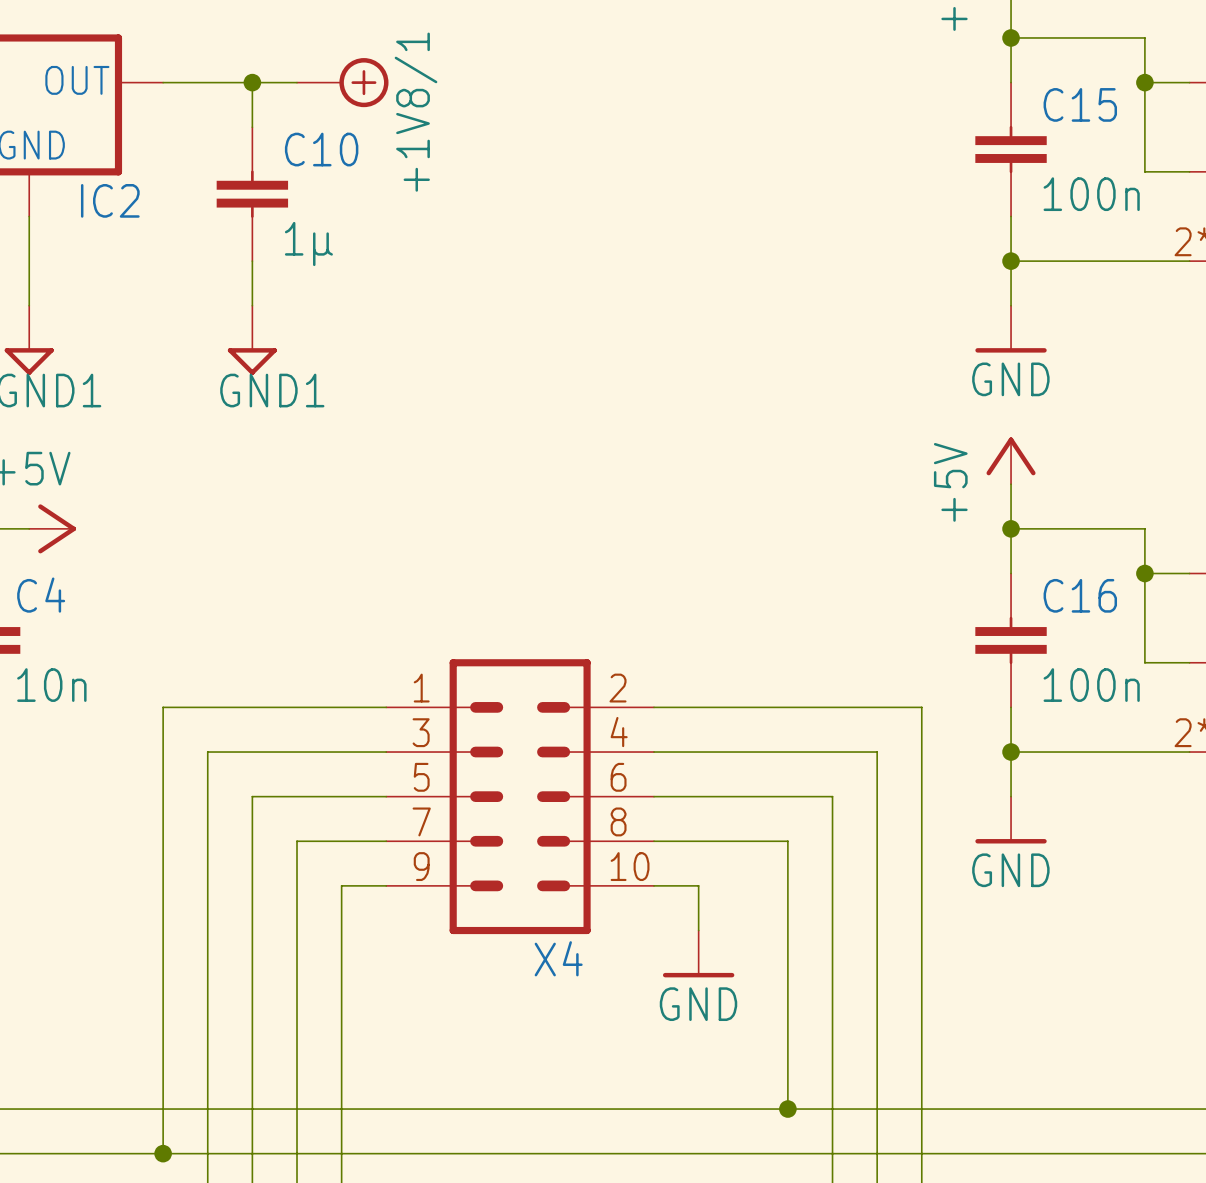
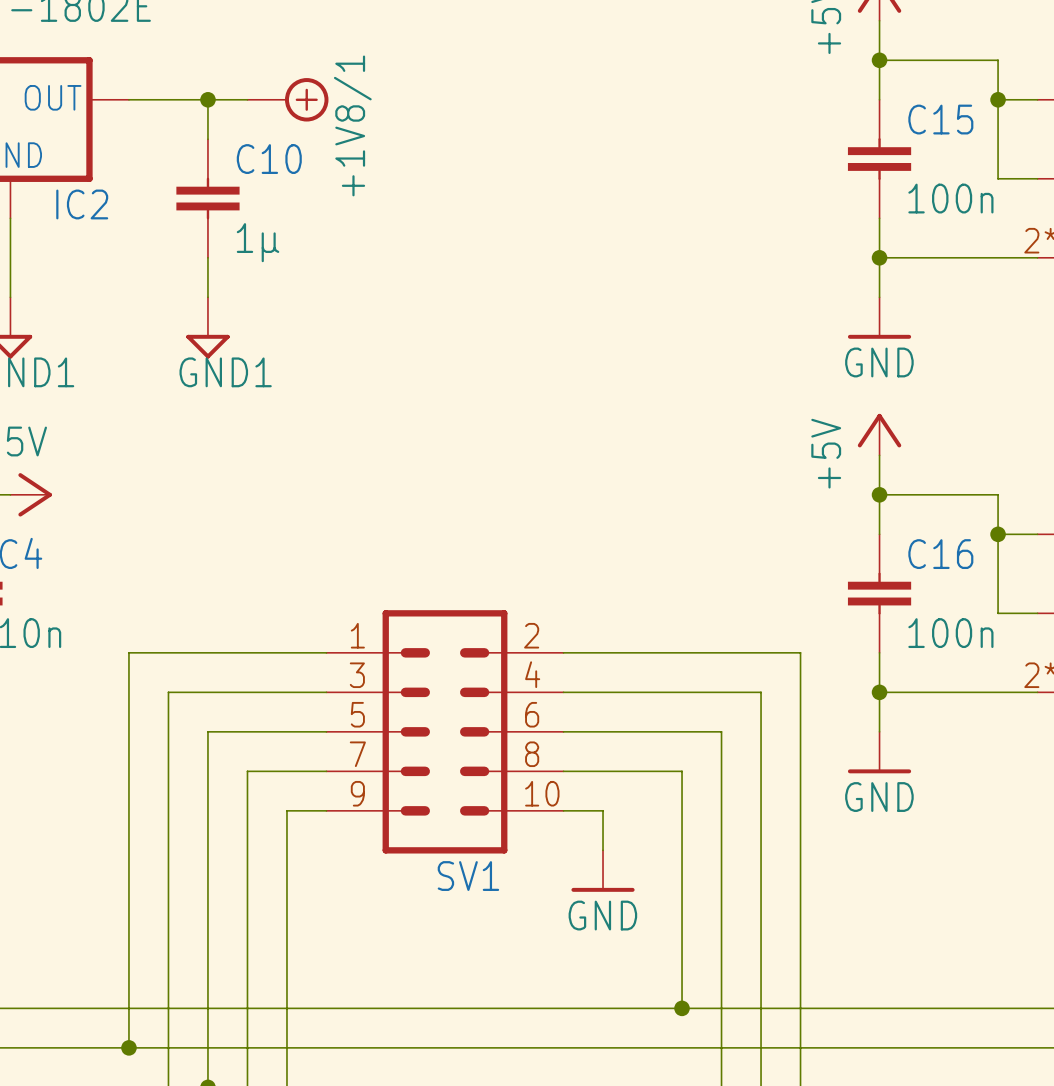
X4 name: X4 (558, 958) -> SV1 (468, 876)

